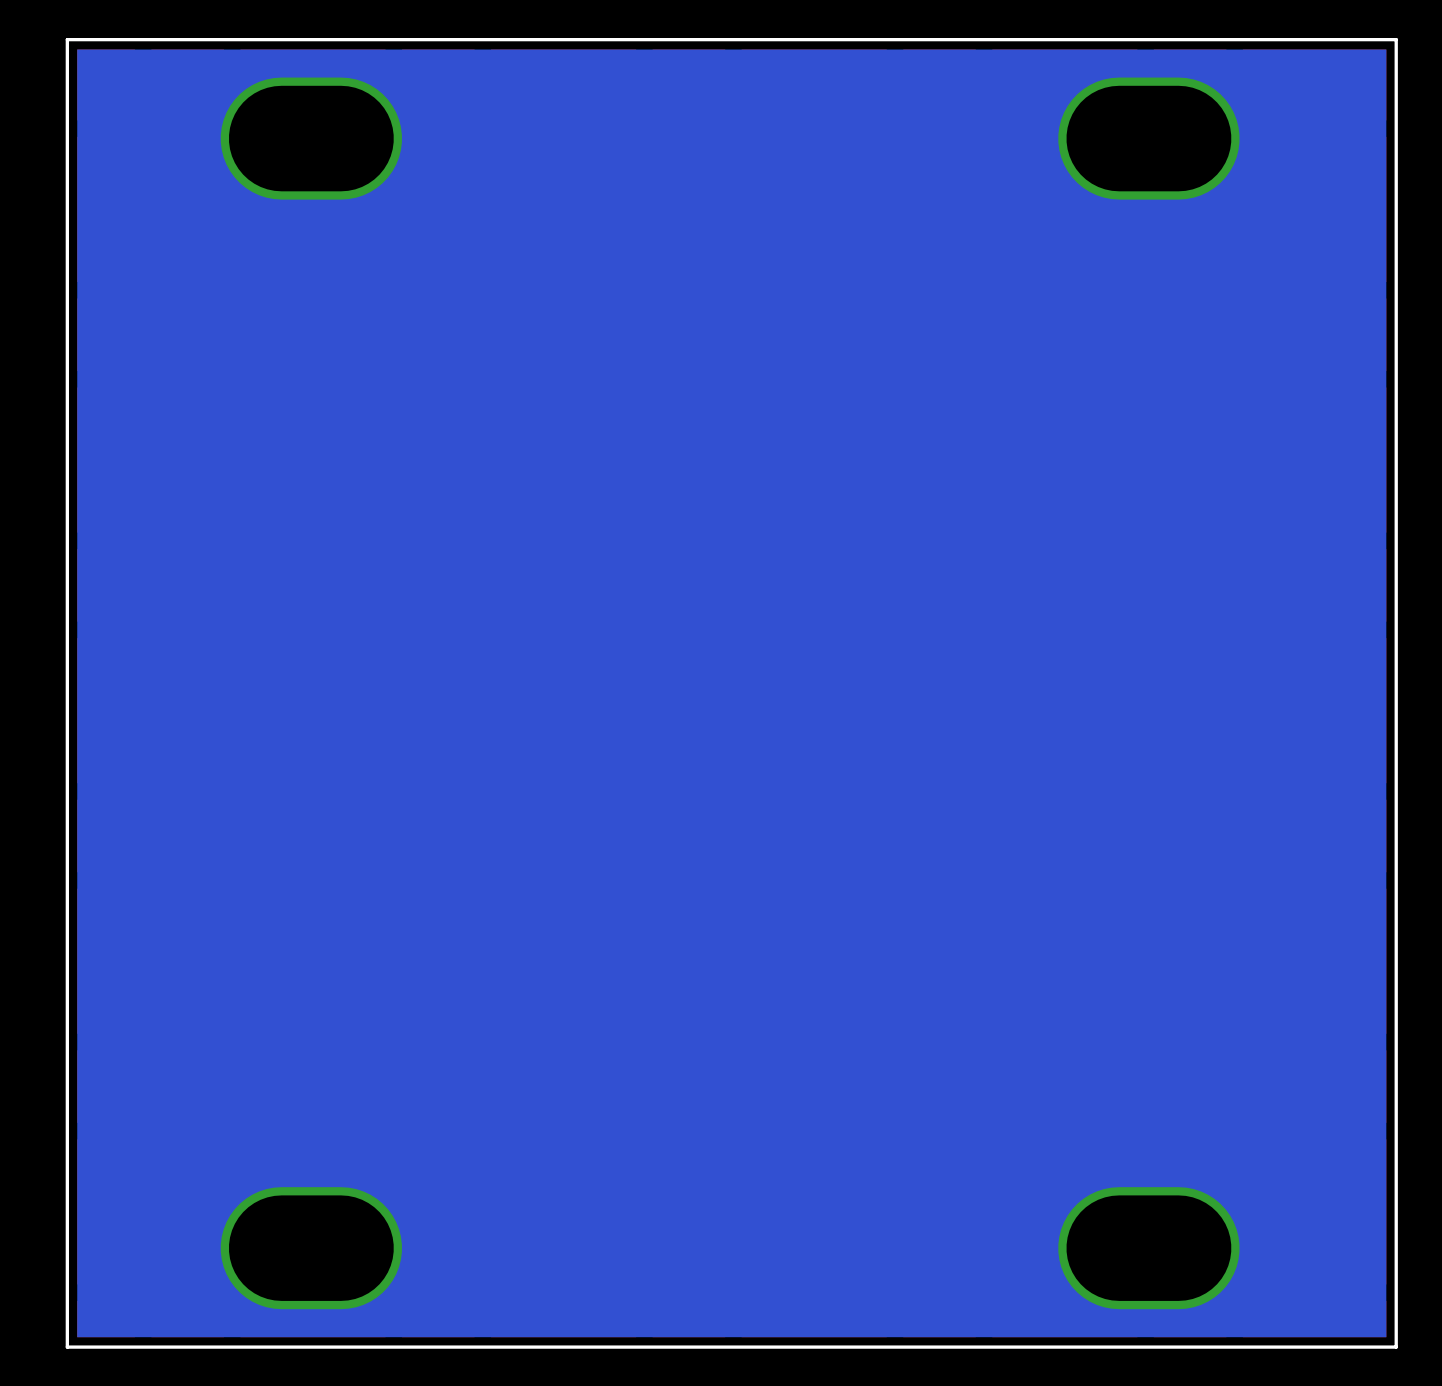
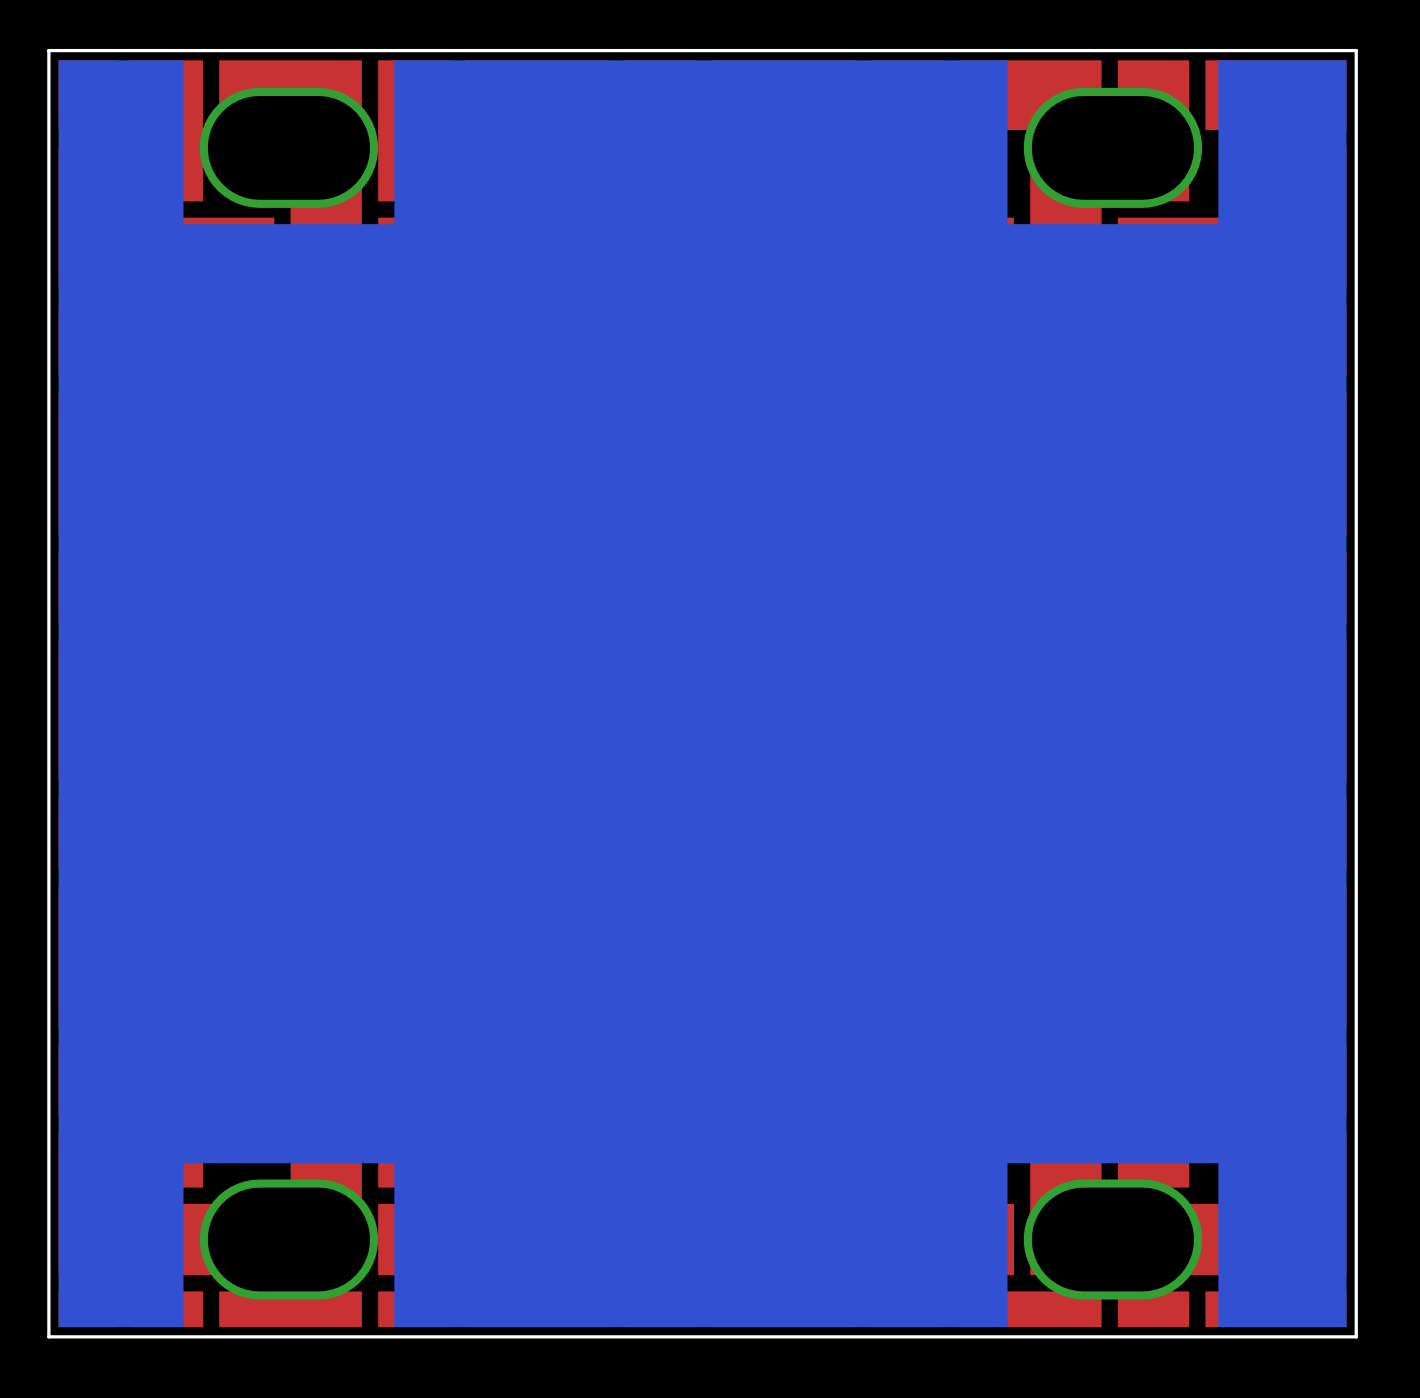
drawing shape: [77, 49, 1387, 1338] -> [183, 224, 1219, 1164]
drawing: none -> [58, 60, 184, 1328]
drawing: none -> [394, 60, 1008, 225]
drawing: none -> [1218, 60, 1347, 1328]
drawing: none -> [394, 1163, 1008, 1328]

